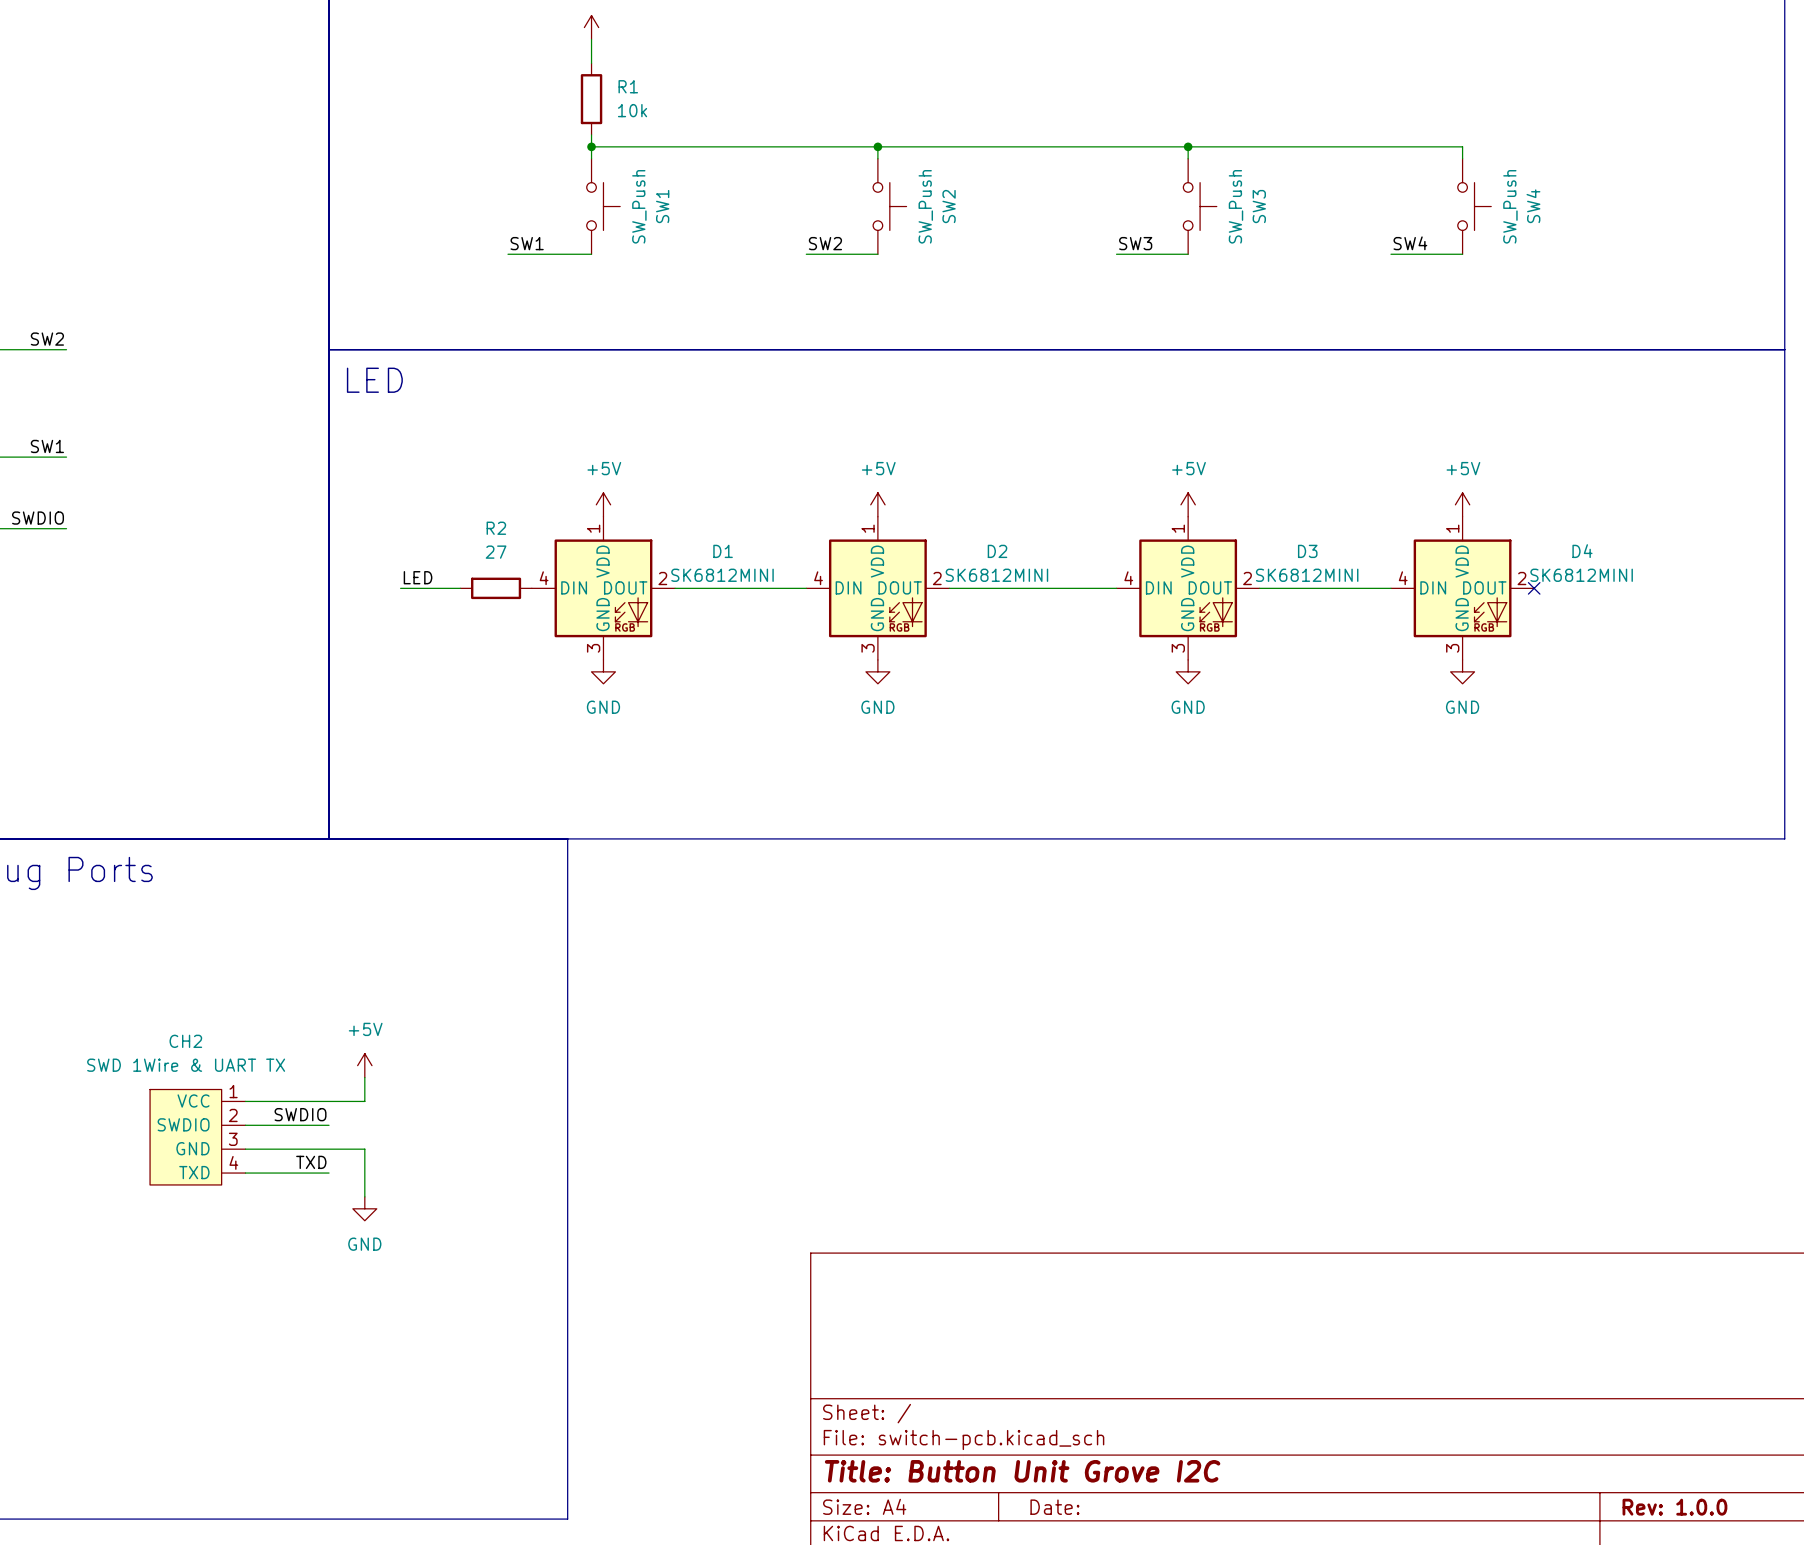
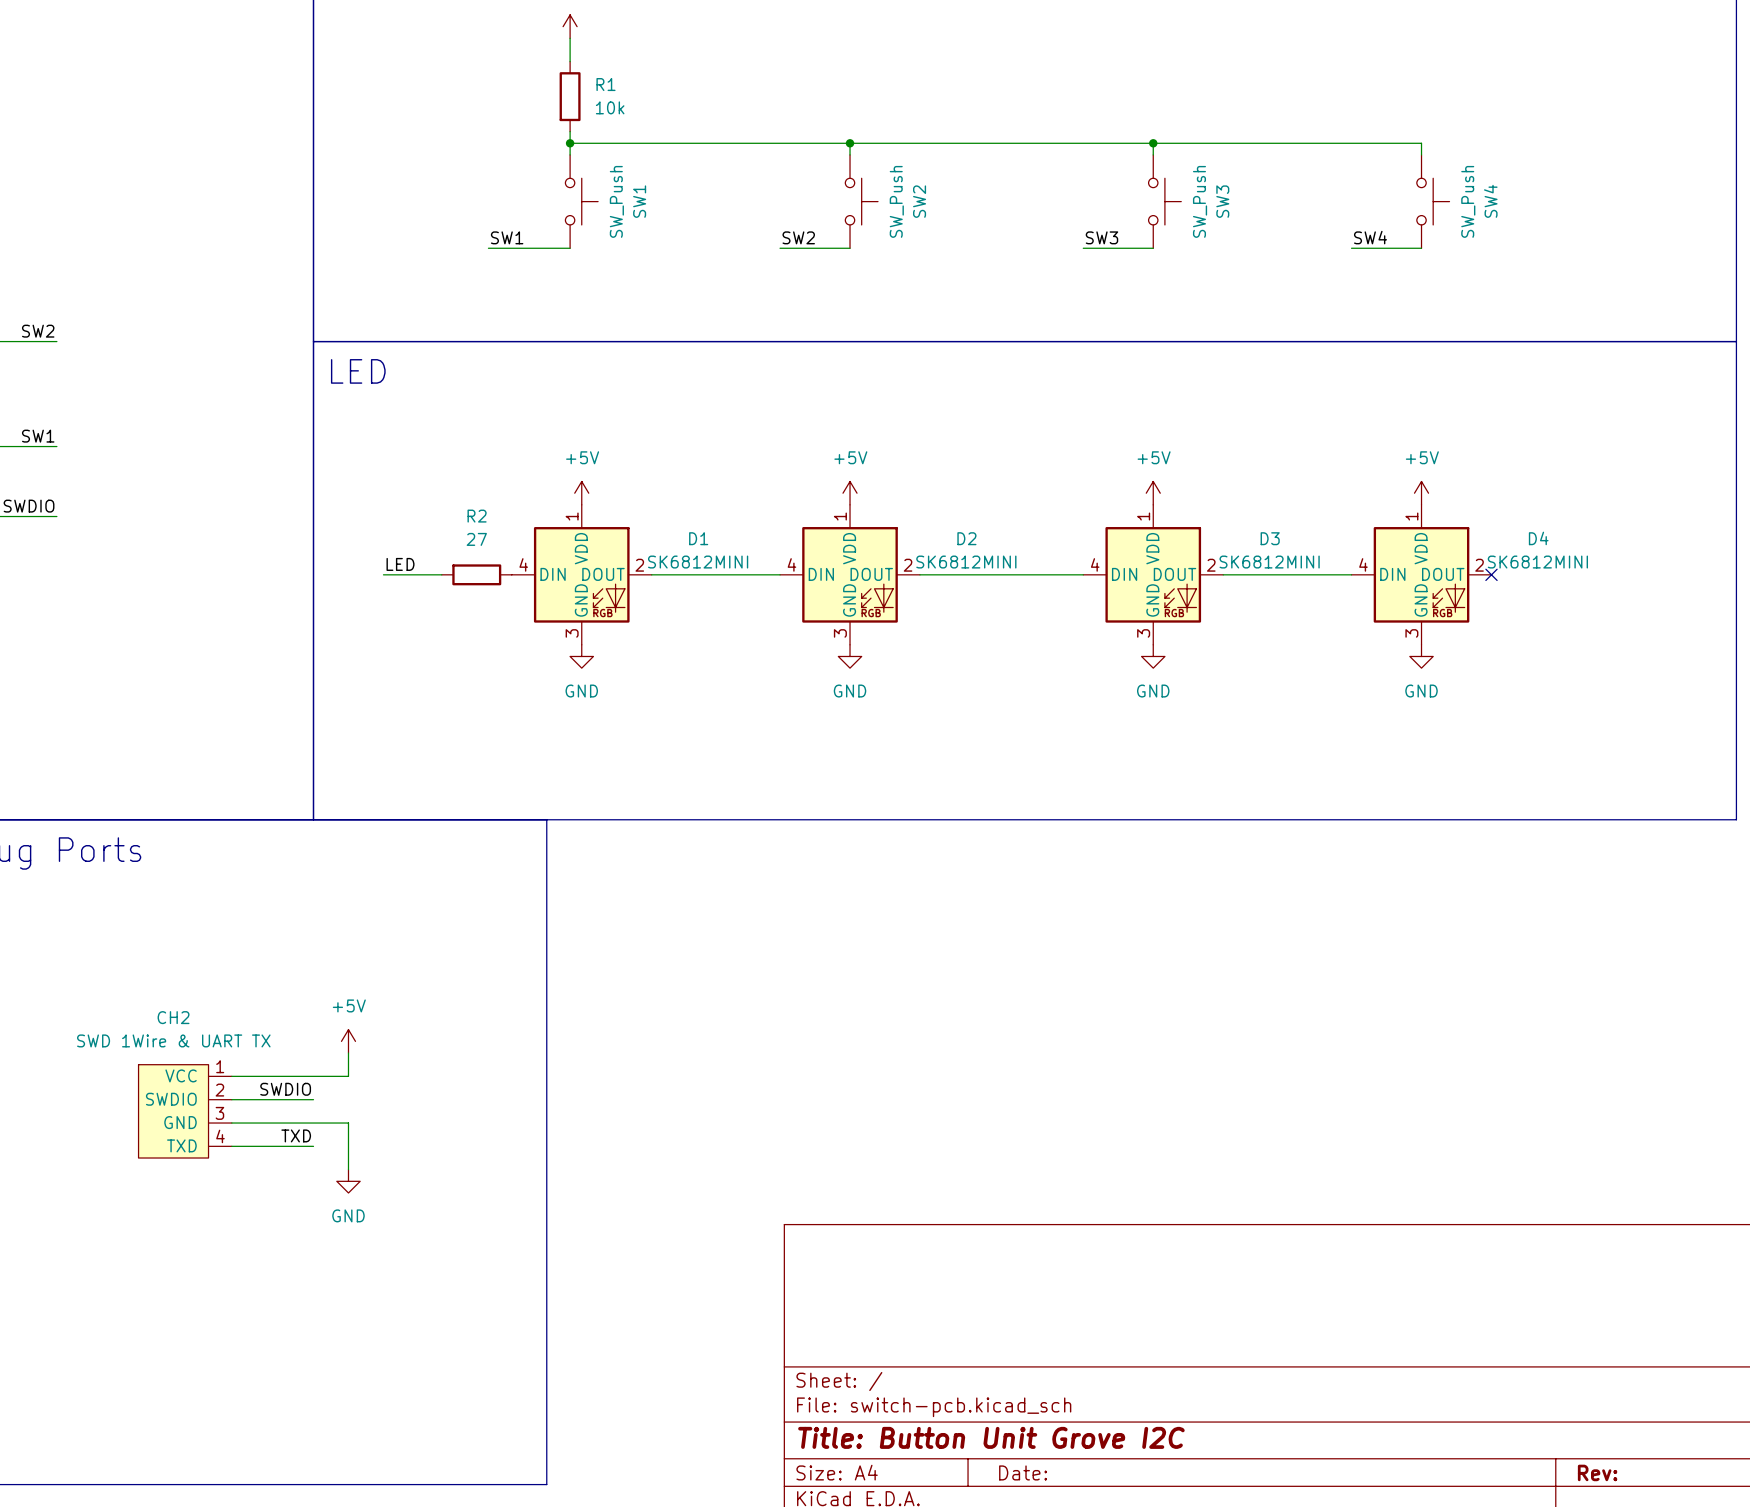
title block: Rev: 1.0.0 (1674, 1507) -> Rev: (1597, 1472)

